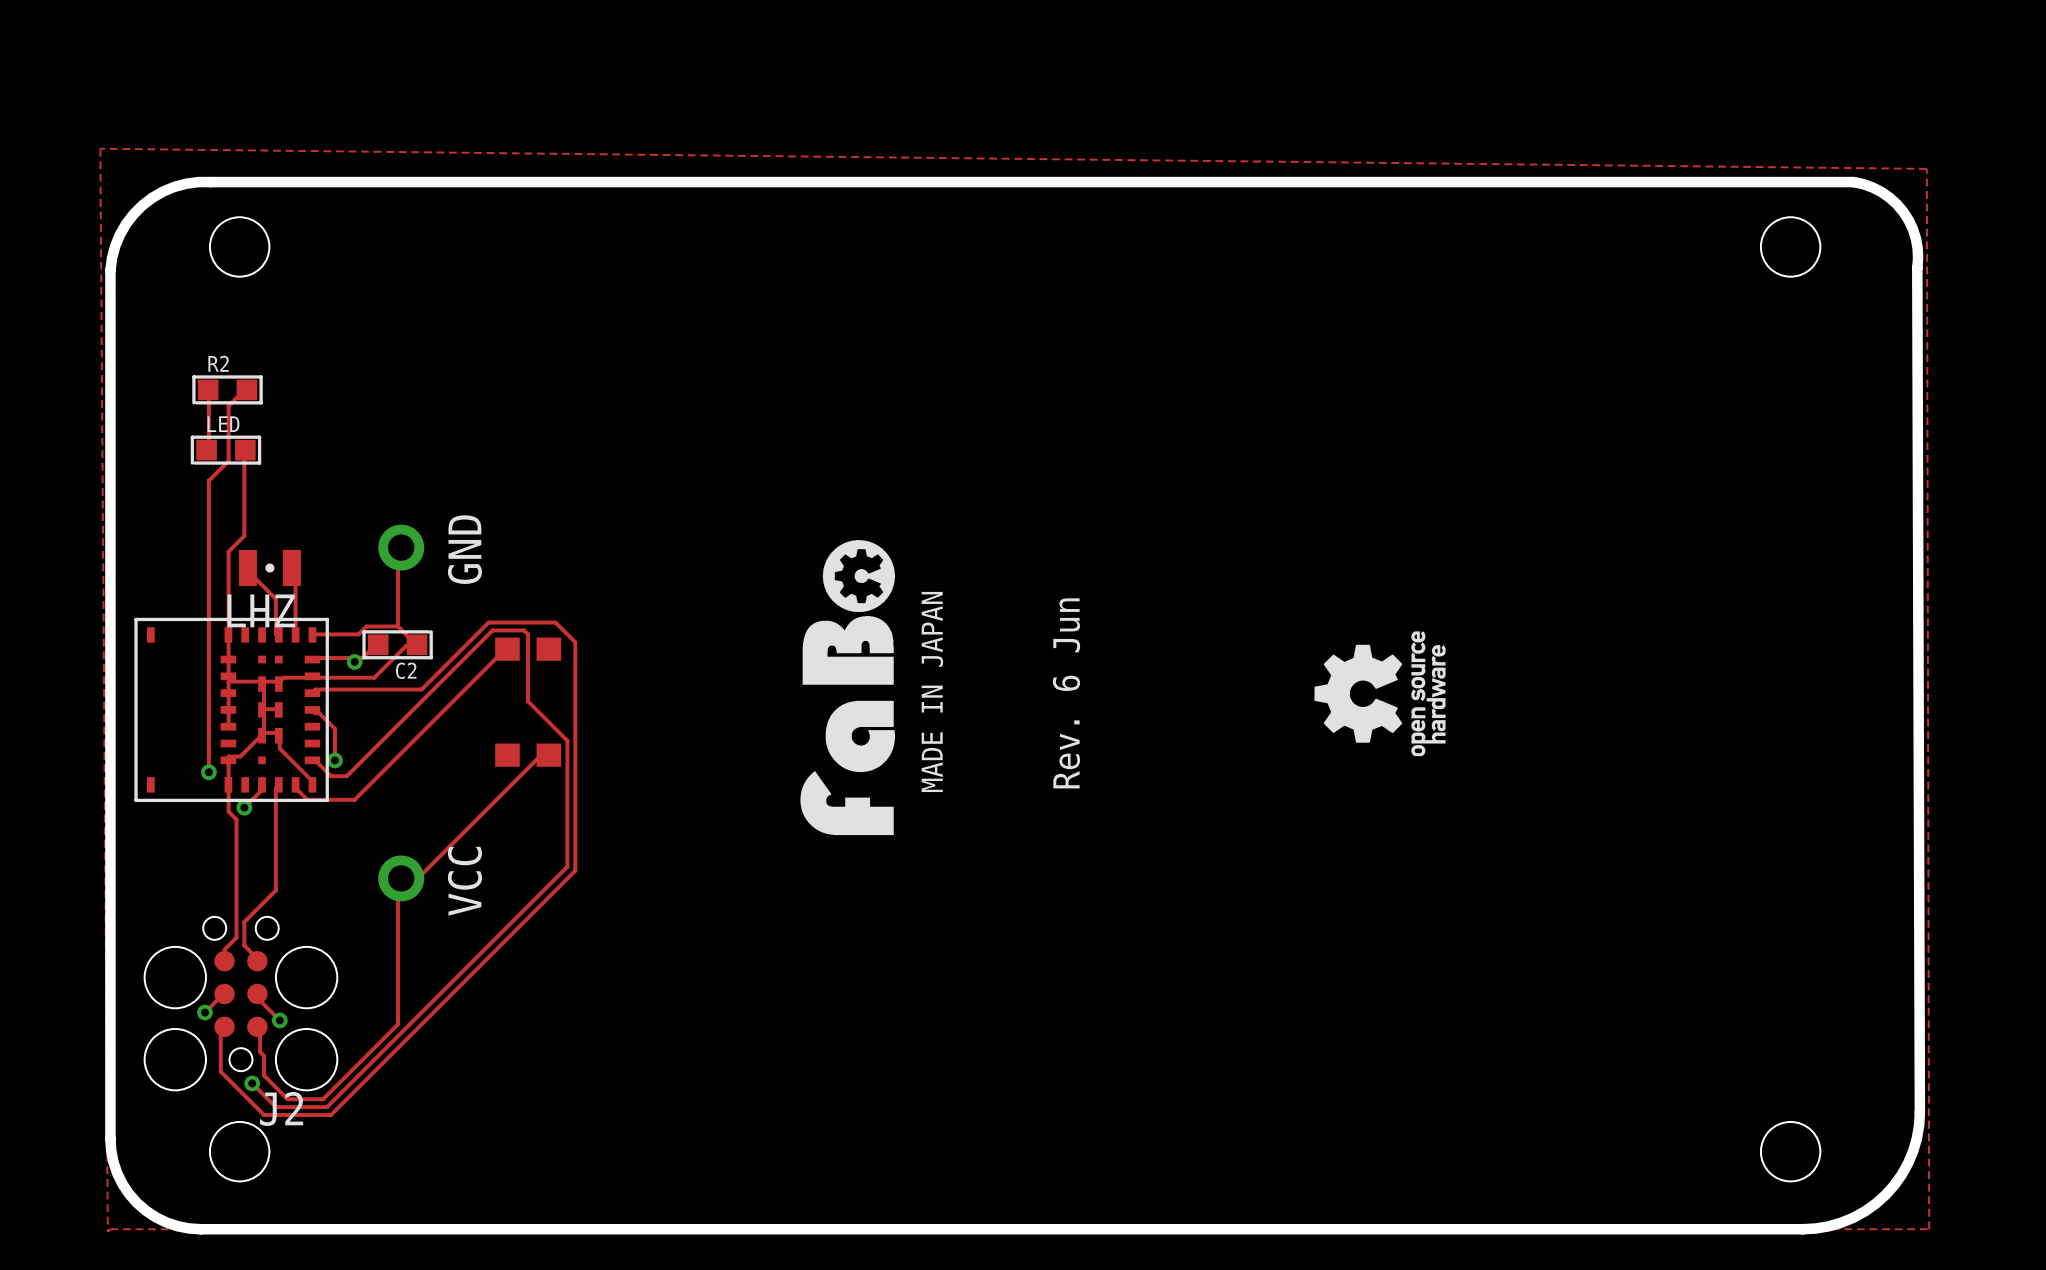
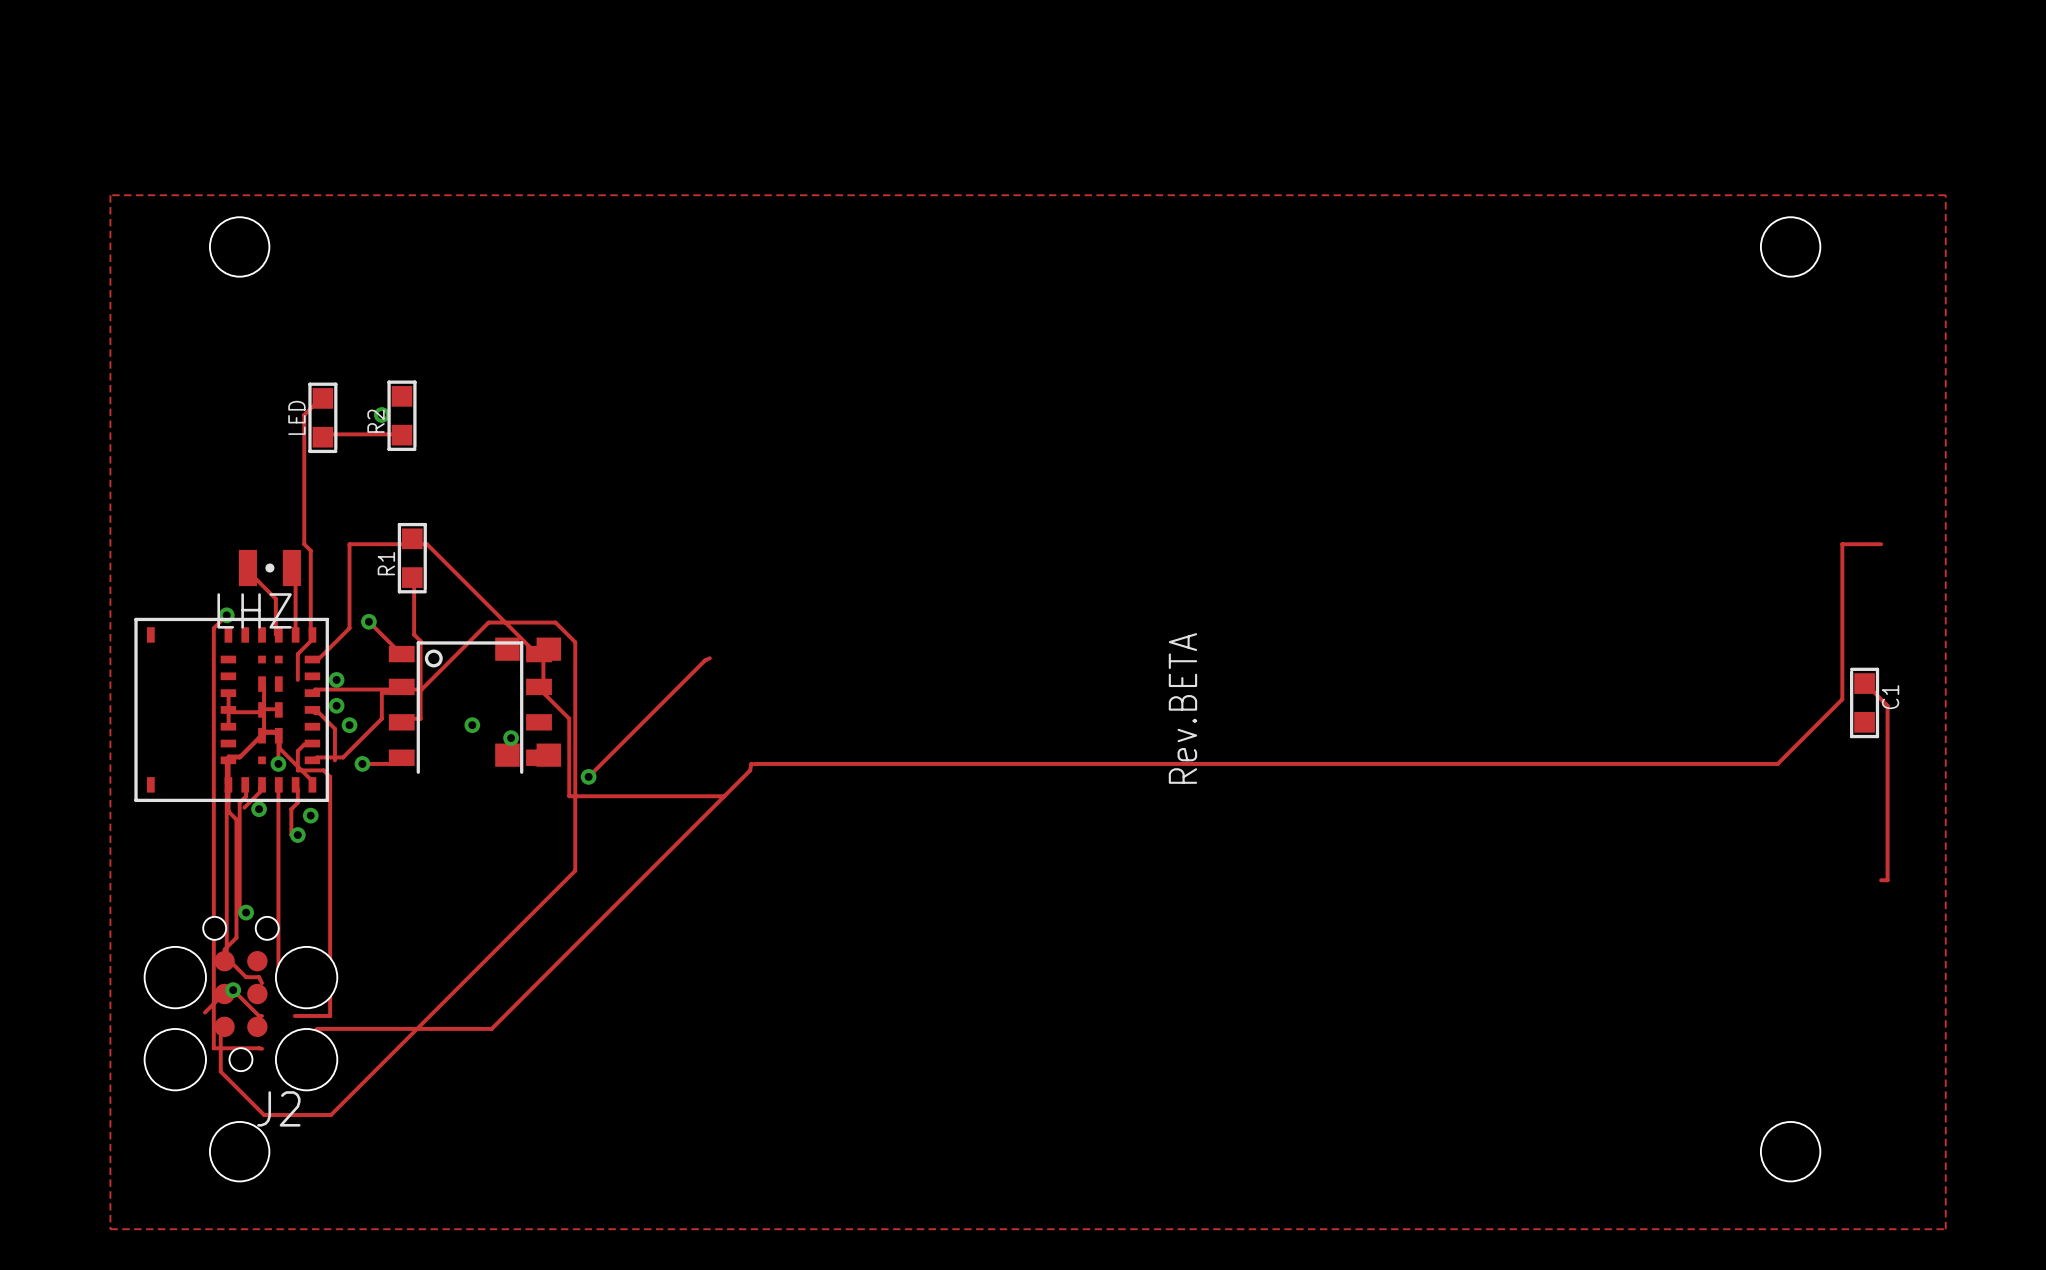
board edge: (211, 182) (1853, 182) (1881, 192) (1896, 204) (1908, 220) (1915, 238) (1918, 258) (1919, 1112) (1913, 1150) (1901, 1174) (1885, 1194) (1865, 1211) (1841, 1222) (1802, 1229) (200, 1229) (177, 1226) (155, 1217) (136, 1202) (122, 1184) (113, 1162) (110, 1138) (110, 270) (112, 258) (119, 234) (133, 214) (142, 205) (152, 197) (174, 186) (186, 183) (211, 182) -> none
track: (208, 389) (208, 449) (206, 450) -> none
R2 rotation: 0° (227, 389) -> 90° counterclockwise (402, 415)
R2 position: (227, 389) -> (402, 415)
track: (246, 389) (244, 390) (228, 405) (228, 461) (208, 480) (208, 772) -> none
track: none -> (322, 398) (304, 414) (304, 544) (310, 550) (310, 634) (312, 634) (310, 641) (297, 654) (297, 679)
via: none -> (381, 414)
track: none -> (402, 435) (323, 434) (322, 437)
LED rotation: 0° (225, 450) -> 90° counterclockwise (322, 417)
LED position: (225, 450) -> (322, 417)
track: (245, 450) (244, 535) (228, 551) (228, 693) -> none
drawing: [800, 540, 895, 836] -> none
track: none -> (1881, 544) (1842, 544) (1842, 699) (1777, 763) (751, 764) (750, 770) (491, 1028) (317, 1028) (297, 1048) (294, 1048)
track: (401, 547) (398, 547) (398, 626) -> none
GND: (401, 547) -> none
R1: none -> (412, 558)
track: none -> (412, 577) (414, 583) (414, 634) (420, 641) (420, 718) (407, 718) (401, 722)
track: none -> (226, 615) (213, 628) (213, 1048) (262, 1048)
via: none -> (226, 615)
track: none -> (368, 621) (401, 654)
via: none -> (368, 621)
track: (398, 626) (366, 626) (358, 634) (312, 634) -> none
track: (398, 626) (416, 644) (405, 646) (374, 677) (283, 677) (278, 684) (275, 681) (264, 681) (262, 684) (260, 681) (228, 681) -> none
drawing: [1314, 631, 1446, 757] -> none
track: (378, 644) (362, 658) (312, 659) -> (724, 796) (569, 796) (569, 718) (539, 686) (543, 686) (543, 654) (536, 654) (427, 544) (414, 544) (412, 538) (407, 544) (349, 544) (349, 628) (317, 660) (312, 659)
C2: (397, 644) -> none
track: (507, 649) (354, 799) (307, 799) (295, 788) (295, 784) -> (297, 835) (291, 835) (291, 809) (297, 802) (297, 789) (295, 784)
track: none -> (709, 658) (704, 660) (588, 776)
via: (354, 661) -> none
via: none -> (336, 679)
track: none -> (1864, 683) (1887, 705) (1887, 880) (1881, 880)
text: MADE IN JAPAN (932, 691) -> none
text: Rev. 6 Jun (1066, 693) -> none
C1: none -> (1864, 702)
via: none -> (336, 705)
part: none -> (470, 707)
track: none -> (228, 709) (233, 712) (259, 712) (262, 709)
text: none -> Rev.BETA (1182, 708)
via: none -> (349, 725)
via: none -> (472, 725)
via: none -> (511, 738)
track: none -> (312, 743) (304, 744) (297, 751) (297, 770) (323, 770) (330, 776) (330, 1015) (294, 1015)
track: (548, 755) (539, 756) (421, 874) (401, 874) (401, 878) (398, 878) (398, 1024) (323, 1099) (287, 1099) (264, 1075) (264, 1055) (260, 1051) (260, 1028) (257, 1026) -> none
track: none -> (401, 757) (401, 763) (362, 763)
track: (312, 760) (315, 760) (331, 776) (346, 776) (492, 630) (524, 630) (528, 634) (528, 701) (567, 740) (567, 866) (327, 1107) (275, 1107) (252, 1083) -> (312, 760) (317, 757) (343, 757) (381, 718) (381, 692) (401, 692) (401, 686)
via: (334, 760) -> none
track: none -> (278, 763) (278, 731) (265, 731) (239, 757) (233, 757) (226, 763) (226, 783) (228, 784) (226, 789) (226, 957) (246, 977) (259, 977) (262, 983)
via: none -> (278, 763)
via: none -> (362, 763)
via: (208, 772) -> none
via: none -> (588, 776)
track: none -> (245, 784) (246, 796) (239, 802) (239, 912) (246, 912)
track: (278, 784) (275, 788) (275, 890) (244, 921) (244, 945) (257, 961) -> (278, 784) (278, 977) (291, 977) (294, 983)
via position: (244, 807) -> (259, 809)
via: none -> (310, 815)
via: none -> (297, 835)
VCC: (401, 878) -> none
via: none -> (246, 912)
track: none -> (233, 990) (259, 1015) (262, 1015)
via: none -> (233, 990)
track: (257, 994) (256, 996) (279, 1020) -> none
via: (204, 1012) -> none
via: (279, 1020) -> none
via: (252, 1083) -> none
zone outline: (110, 1229) (107, 1231) (100, 148) (1926, 168) (1929, 1229) -> (110, 1229) (110, 195) (1945, 195) (1945, 1229) (1929, 1229)

